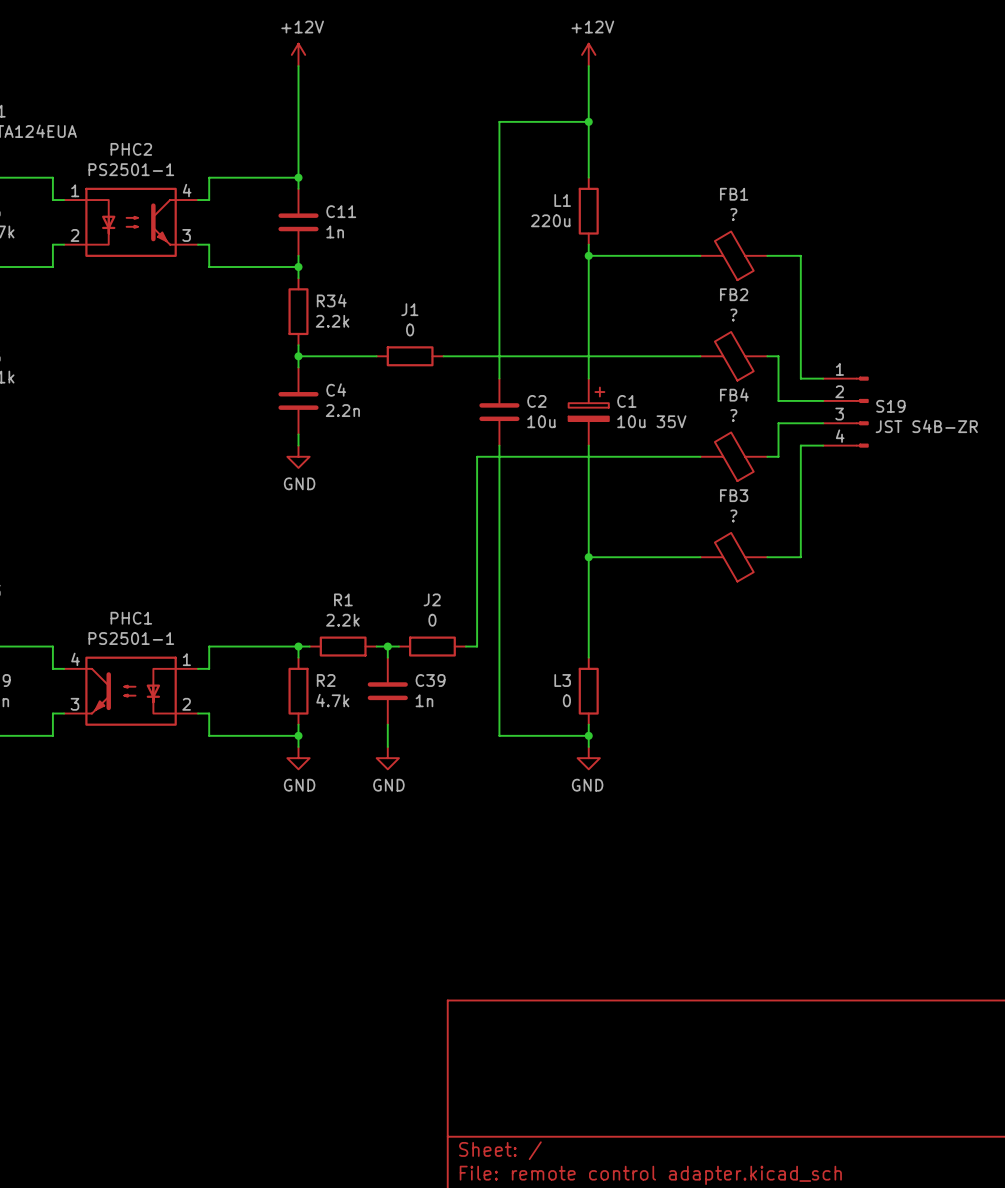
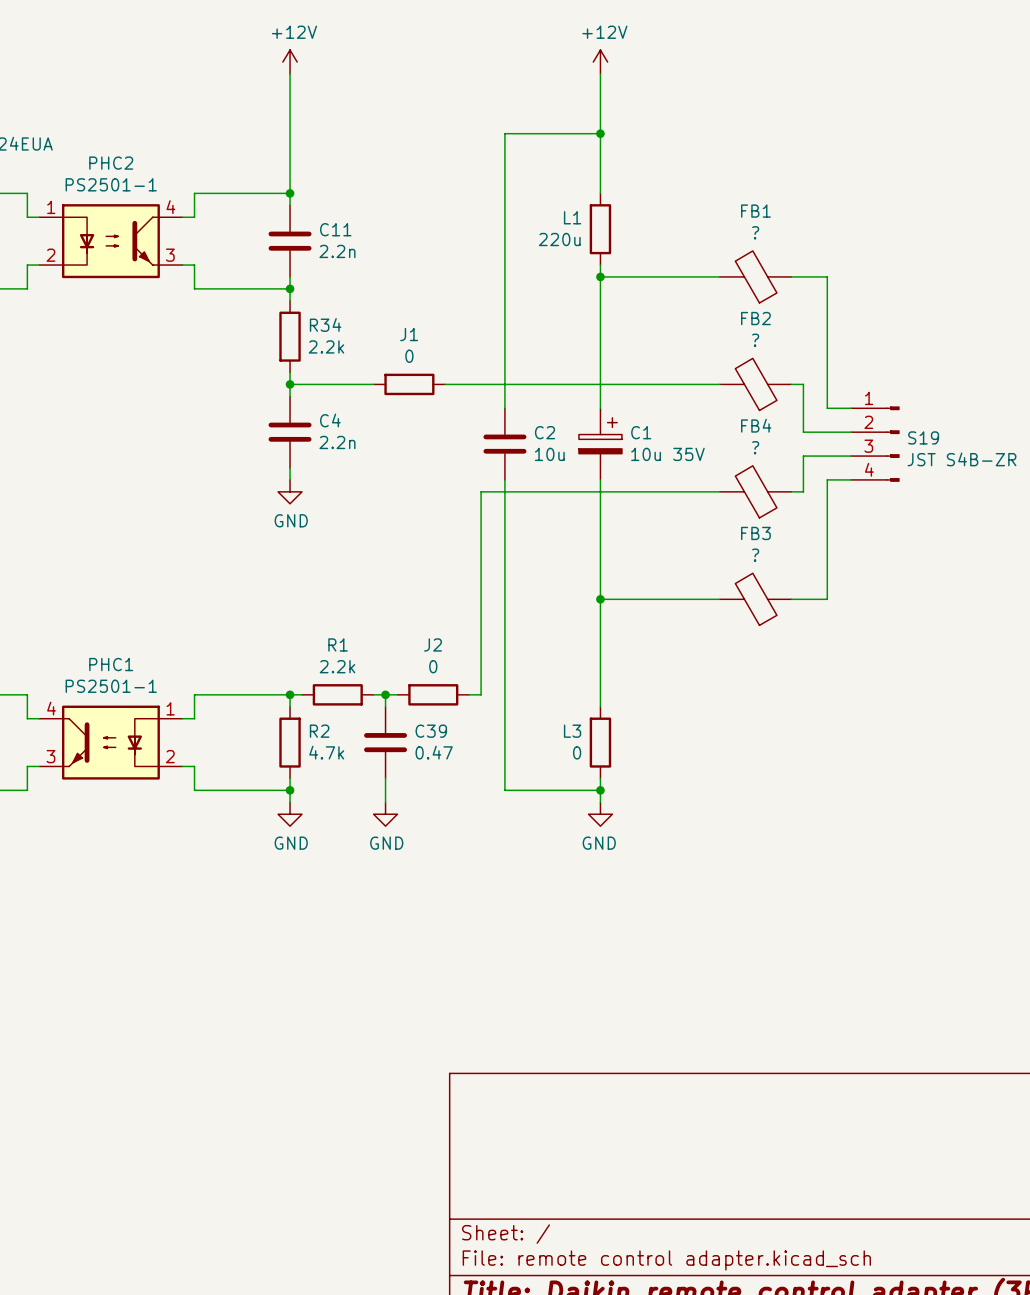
C11 value: 1n (335, 231) -> 2.2n (337, 251)
C39 value: 1n (424, 700) -> 0.47 (434, 752)

